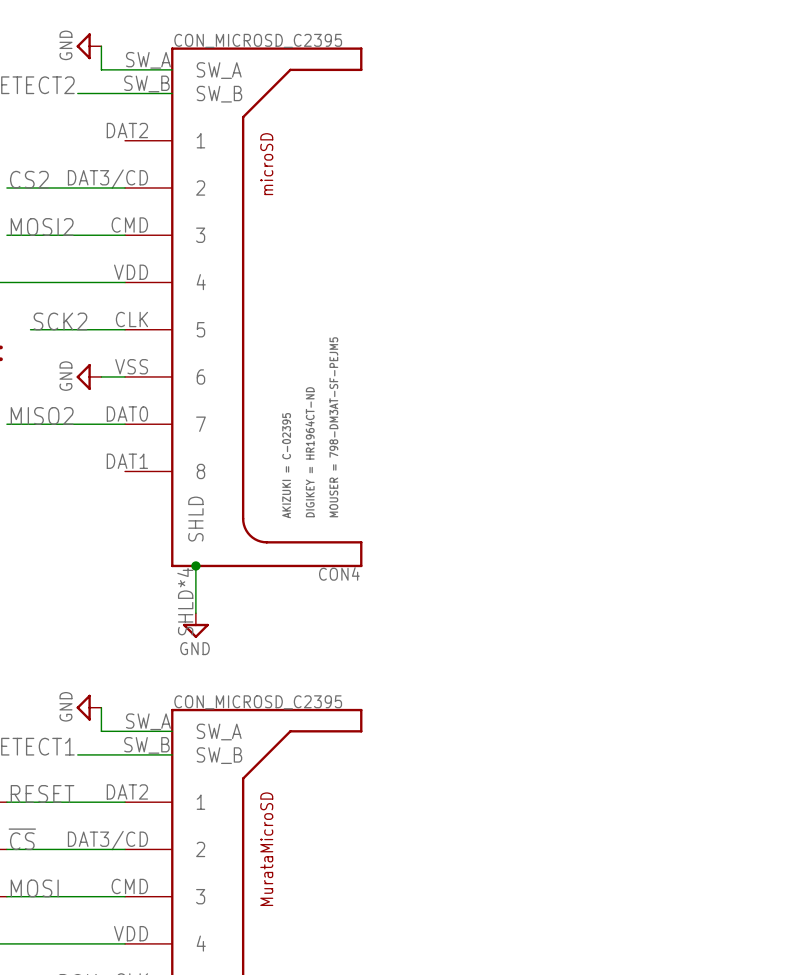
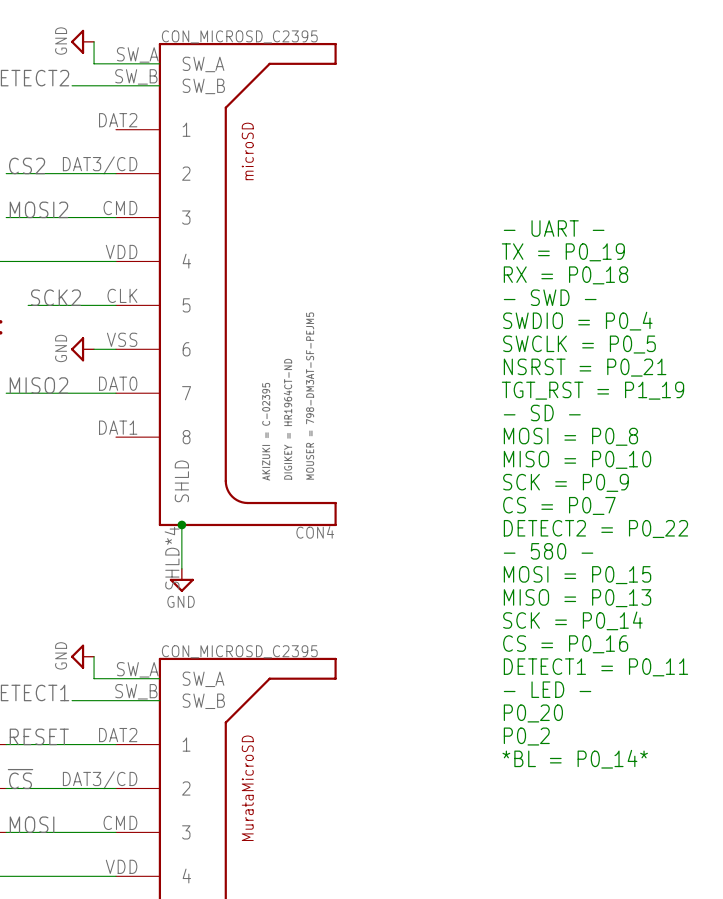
text: none -> - UART - (554, 228)
text: none -> TX = P0_19 (563, 252)
text: none -> RX = P0_18 (565, 275)
text: none -> - SWD - (550, 297)
text: none -> SWDIO = P0_4 (577, 321)
text: none -> SWCLK = P0_5 (579, 344)
text: none -> NSRST = P0_21 (585, 367)
text: none -> TGT_RST = P1_19 (592, 390)
text: none -> - SD - (542, 412)
text: none -> MOSI = P0_8 (570, 436)
text: none -> MISO = P0_10 (577, 459)
text: none -> SCK = P0_9 (565, 482)
text: none -> CS = P0_7 (559, 505)
text: none -> DETECT2 = P0_22 (595, 529)
text: none -> - 580 - (548, 551)
text: none -> MOSI = P0_15 (577, 575)
text: none -> MISO = P0_13 (577, 598)
text: none -> SCK = P0_14 (572, 620)
text: none -> CS = P0_16 (565, 644)
text: none -> DETECT1 = P0_11 (595, 667)
text: none -> - LED - (547, 689)
text: none -> P0_20 (533, 713)
text: none -> P0_2 (526, 736)
text: none -> *BL = P0_14* (575, 759)

